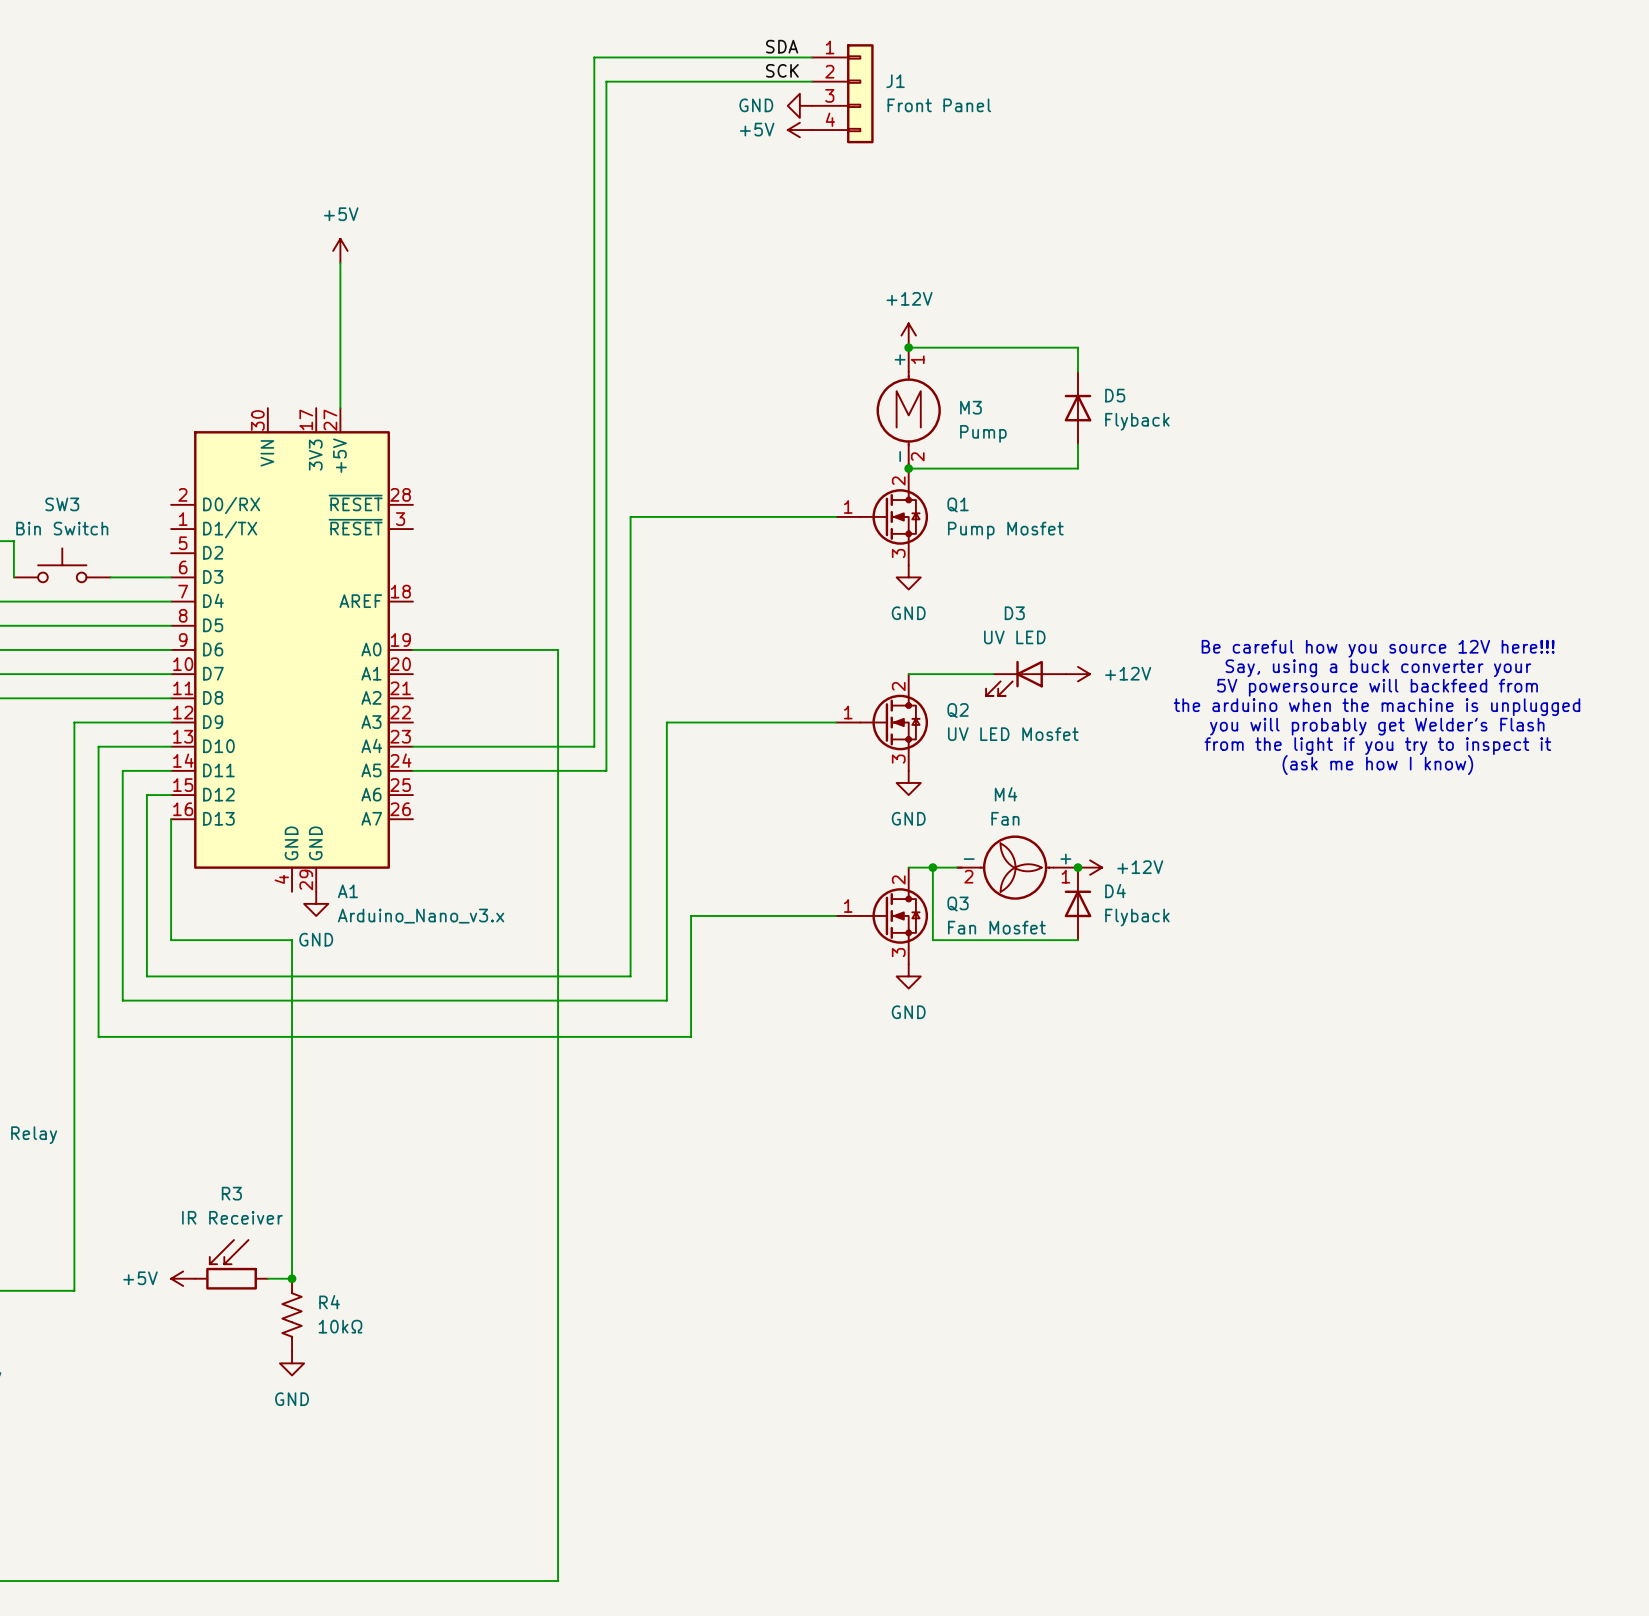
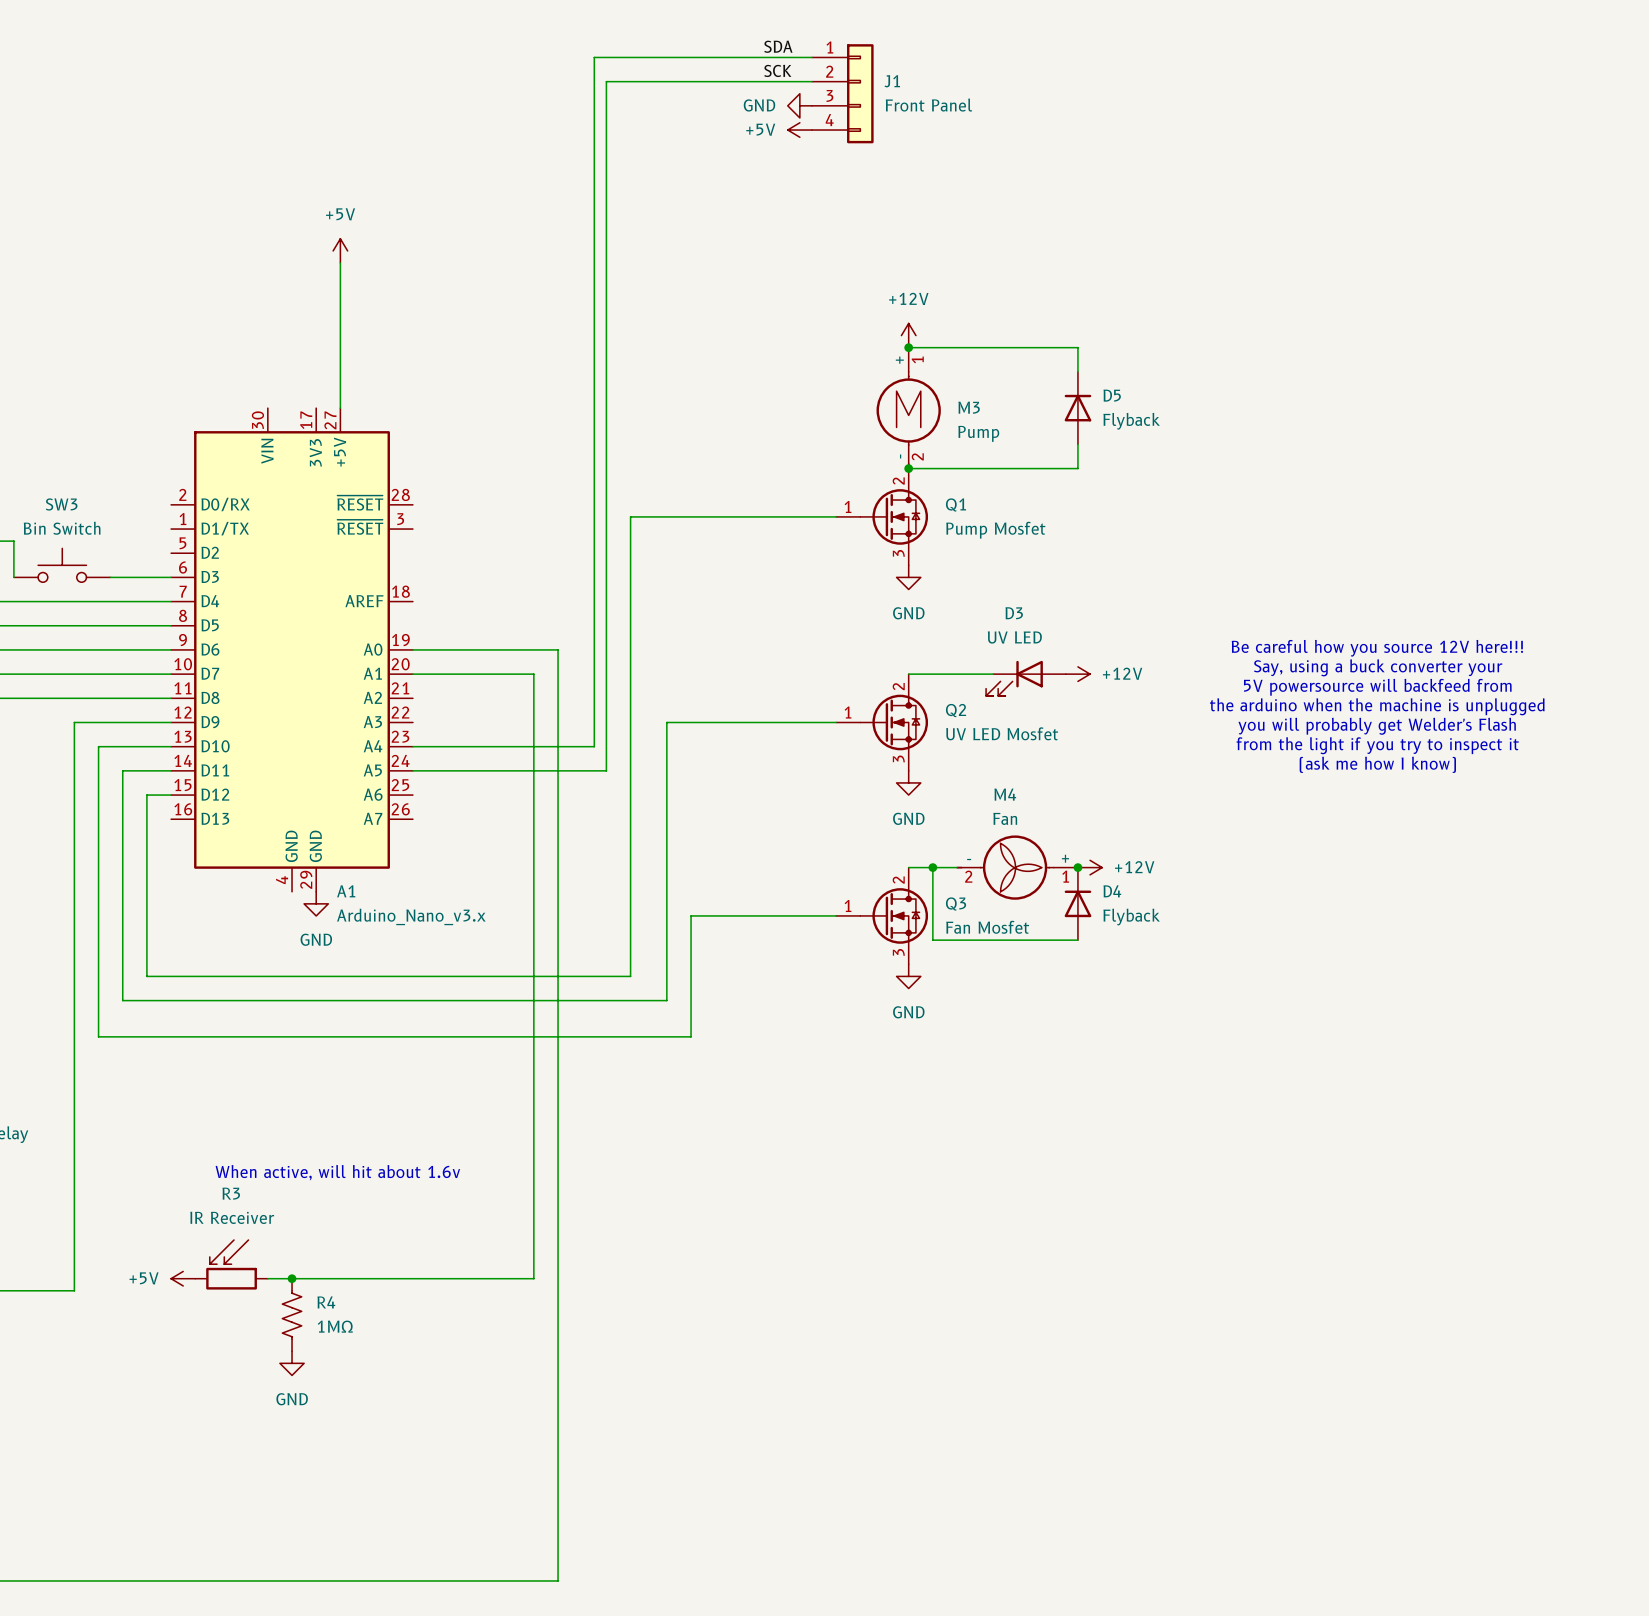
wire: (171, 819) (171, 940) (292, 940) (292, 1278) -> (412, 674) (533, 674) (533, 1278) (292, 1278)
text: none -> When active, will hit about 1.6v (337, 1172)
R4 value: 10kΩ (340, 1326) -> 1MΩ (335, 1326)

